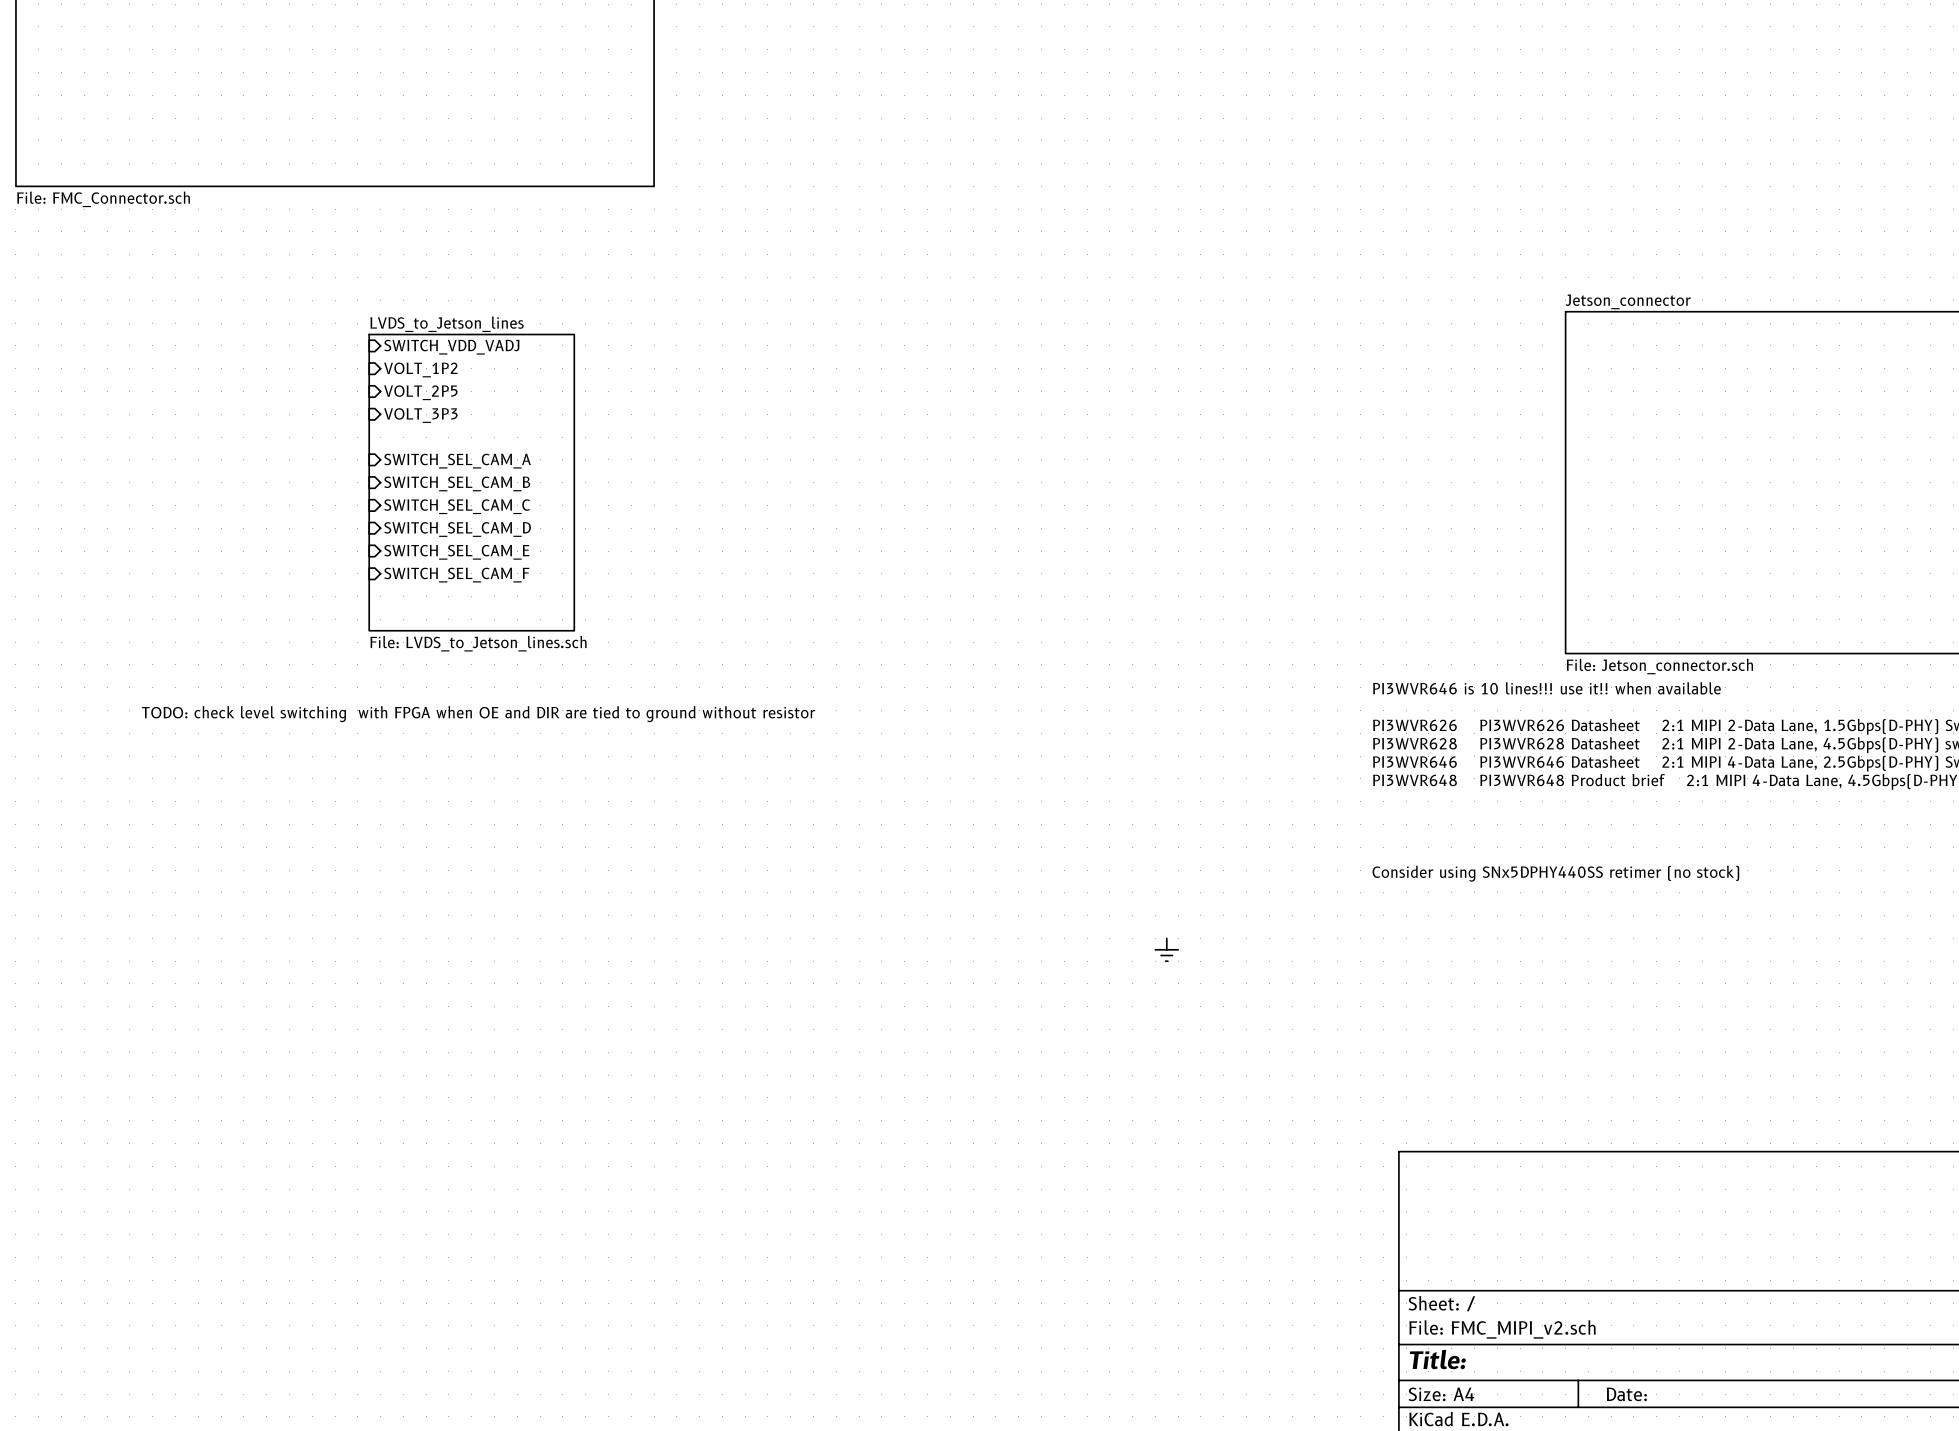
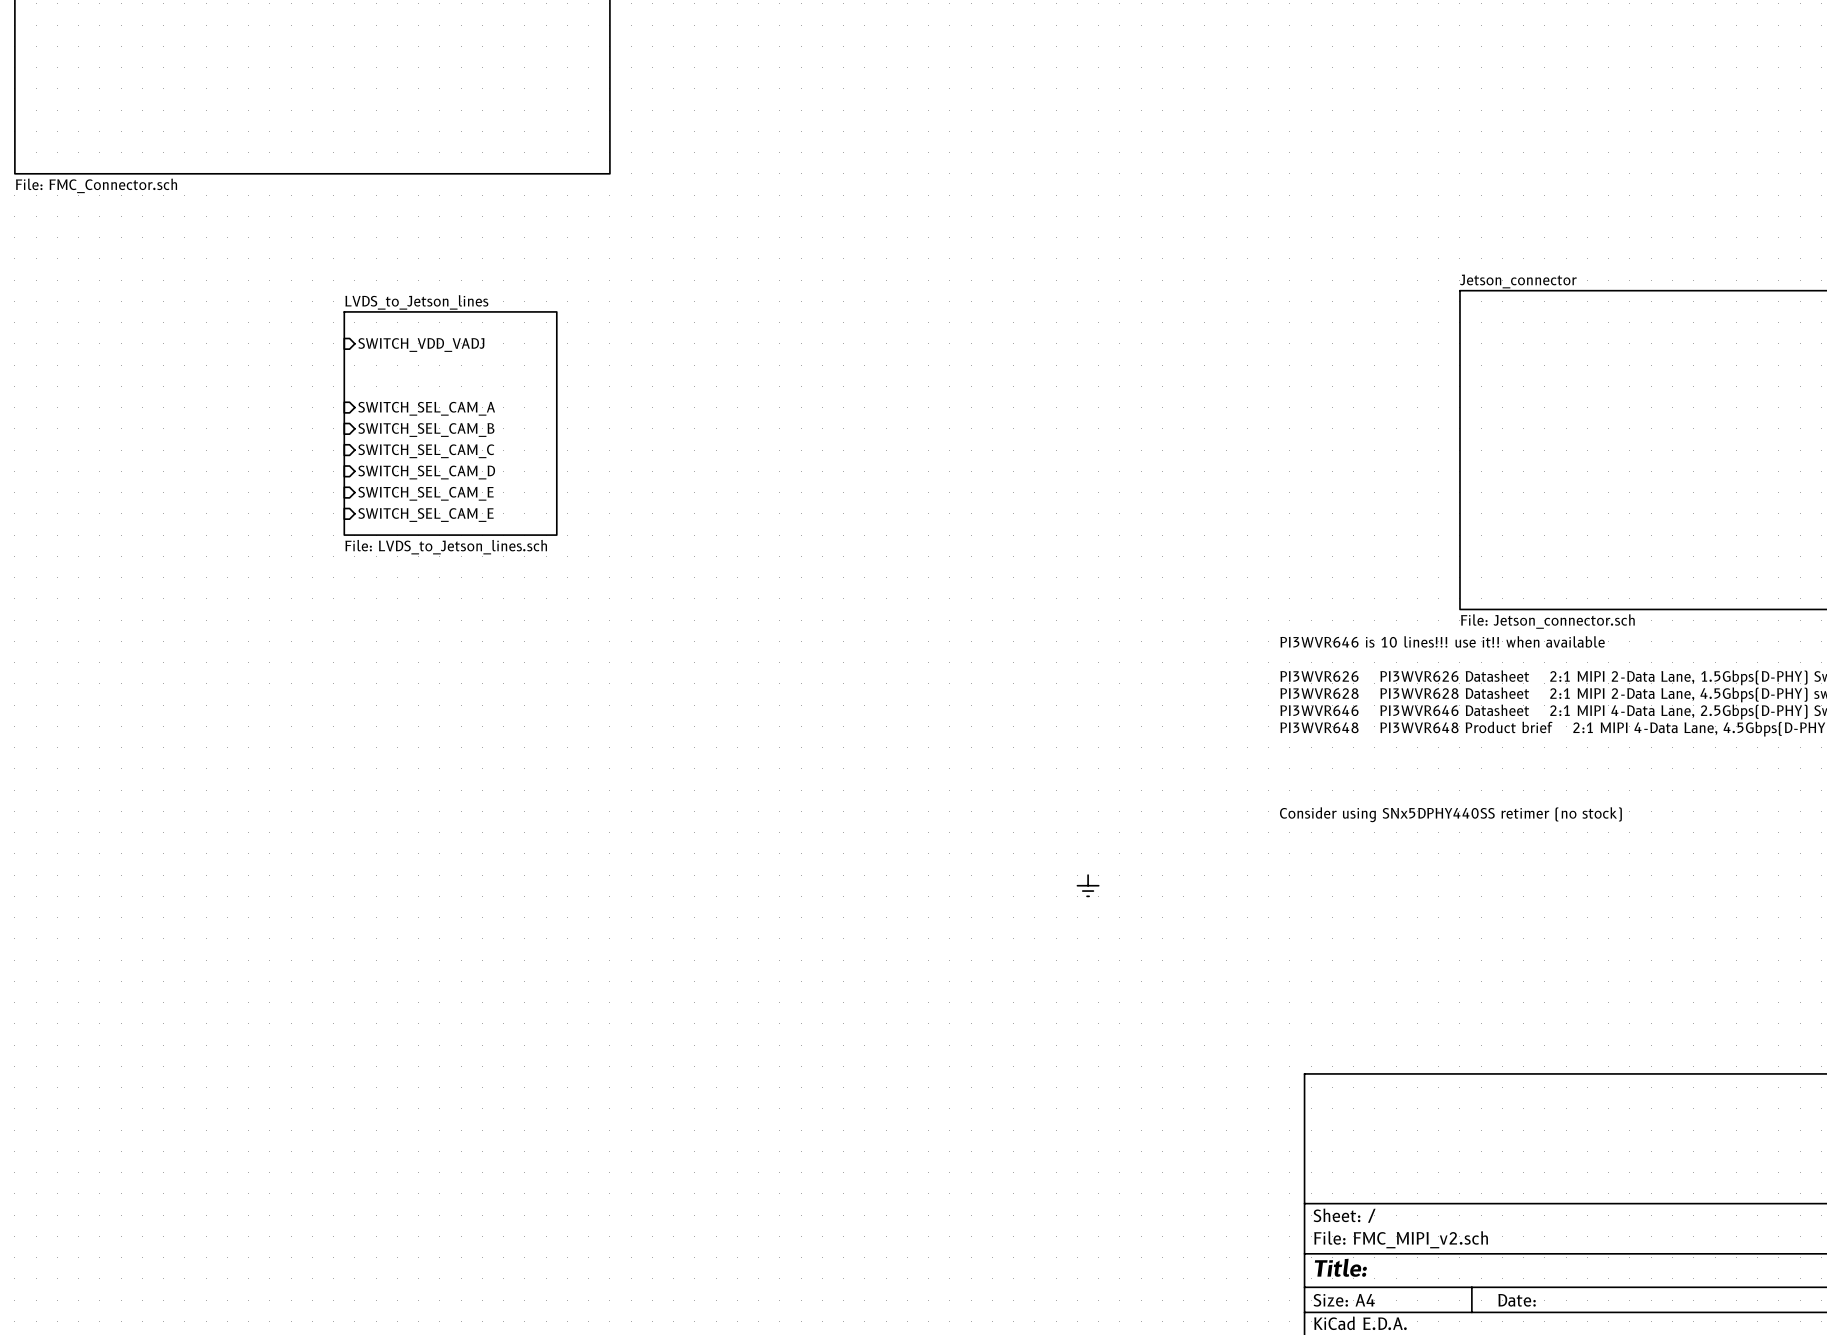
sheet pin: SWITCH_VDD_VADJ (451, 347) -> none
sheet pin: VOLT_1P2 (420, 369) -> SWITCH_VDD_VADJ (421, 345)
sheet pin: VOLT_2P5 (420, 392) -> none
sheet pin: VOLT_3P3 (420, 415) -> none
sheet pin: none -> SWITCH_SEL_CAM_A (426, 408)
sheet LVDS_to_Jetson_lines: none -> File: LVDS_to_Jetson_lines.sch (450, 423)
sheet pin: SWITCH_SEL_CAM_A (457, 461) -> SWITCH_SEL_CAM_B (426, 430)
sheet LVDS_to_Jetson_lines: File: LVDS_to_Jetson_lines.sch (471, 482) -> none
sheet pin: SWITCH_SEL_CAM_B (457, 483) -> SWITCH_SEL_CAM_C (426, 451)
sheet pin: SWITCH_SEL_CAM_C (457, 506) -> SWITCH_SEL_CAM_D (426, 472)
sheet pin: SWITCH_SEL_CAM_D (457, 529) -> SWITCH_SEL_CAM_E (426, 493)
sheet pin: SWITCH_SEL_CAM_F (456, 575) -> none
text: TODO: check level switching with FPGA when OE and DIR are tied to ground without resistor (478, 714) -> none

